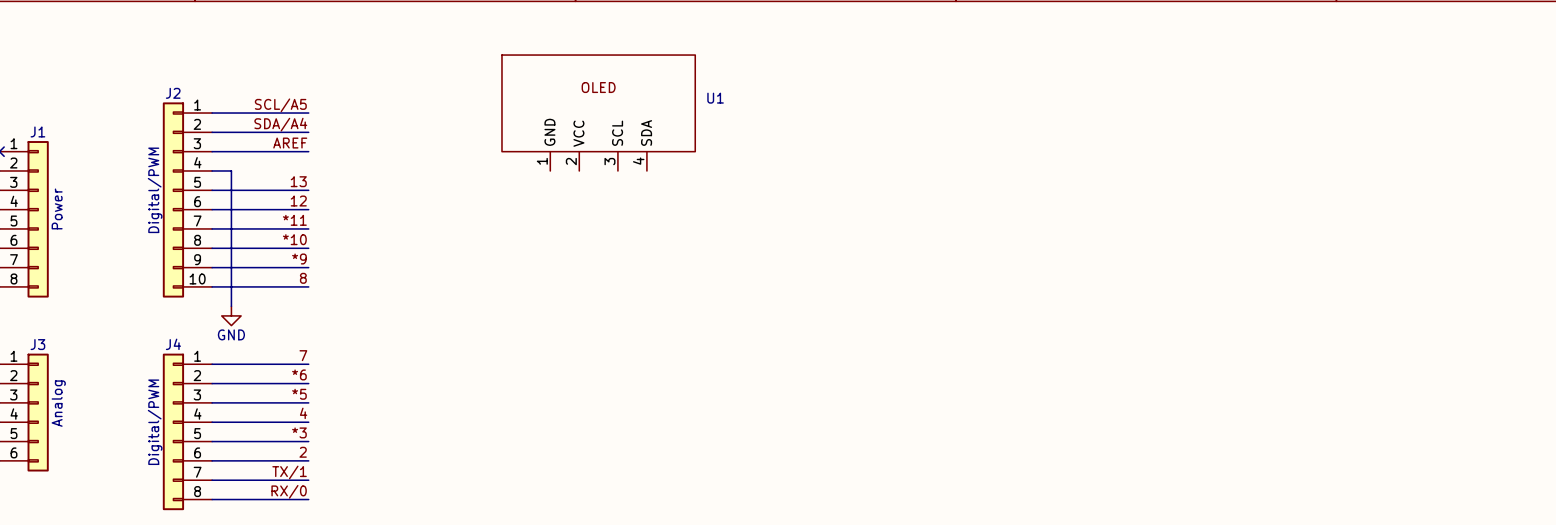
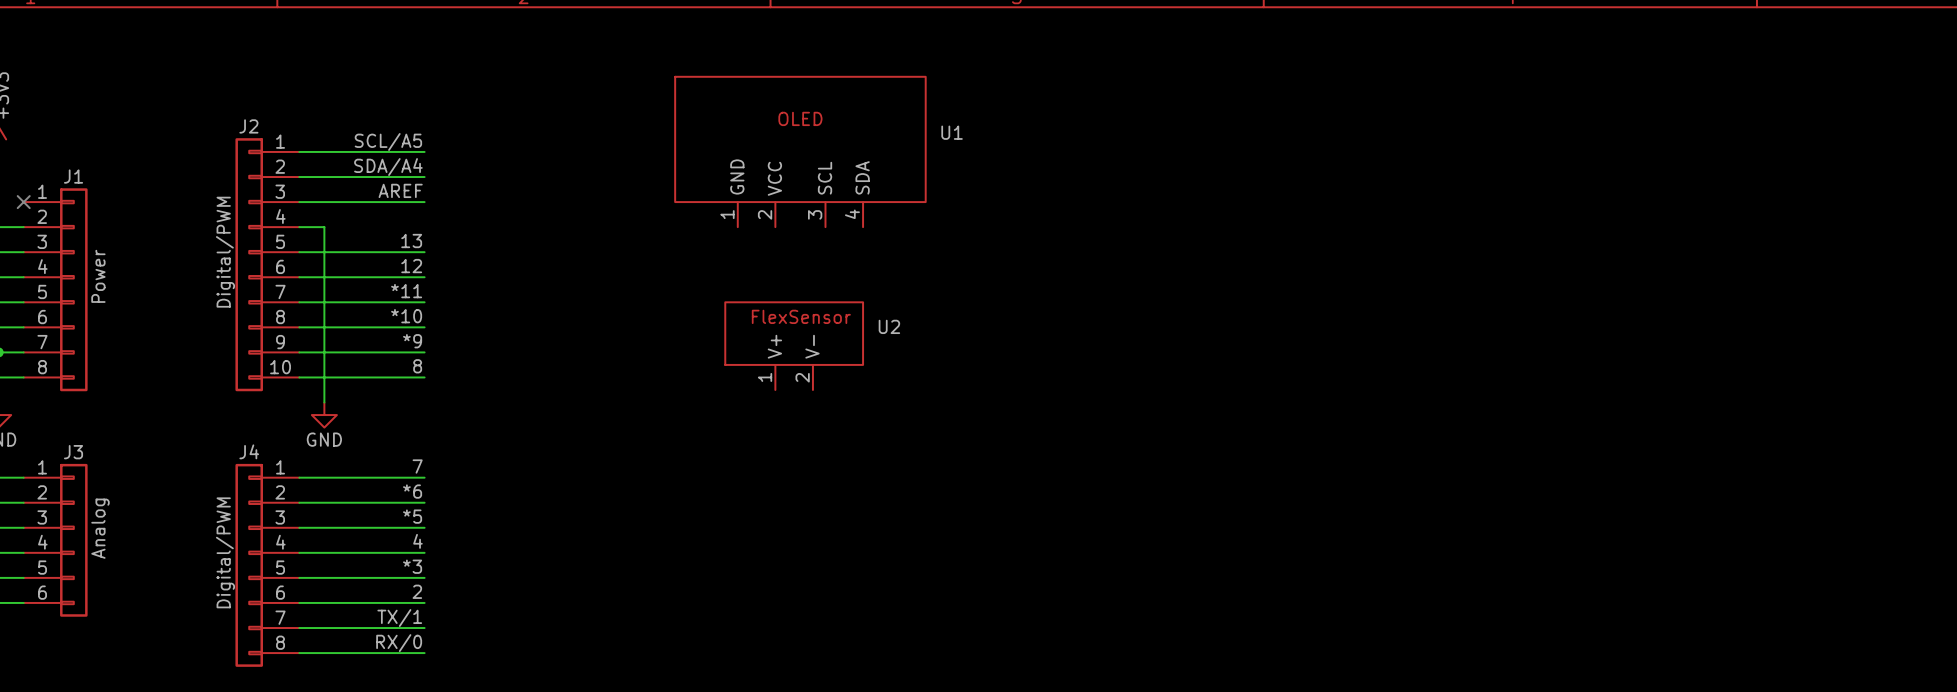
U2: none -> (794, 346)

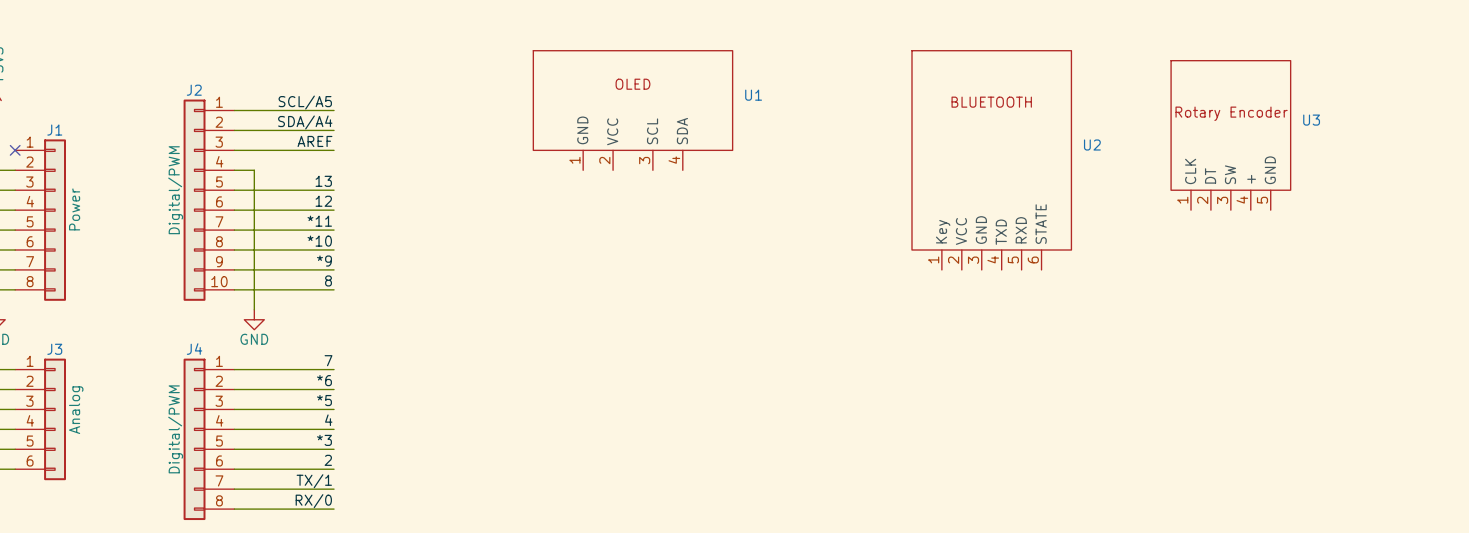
U3: none -> (1230, 135)
U2 symbol: [725, 302, 864, 390] -> [911, 50, 1072, 270]
U2 name position: U2 (889, 326) -> U2 (1092, 145)

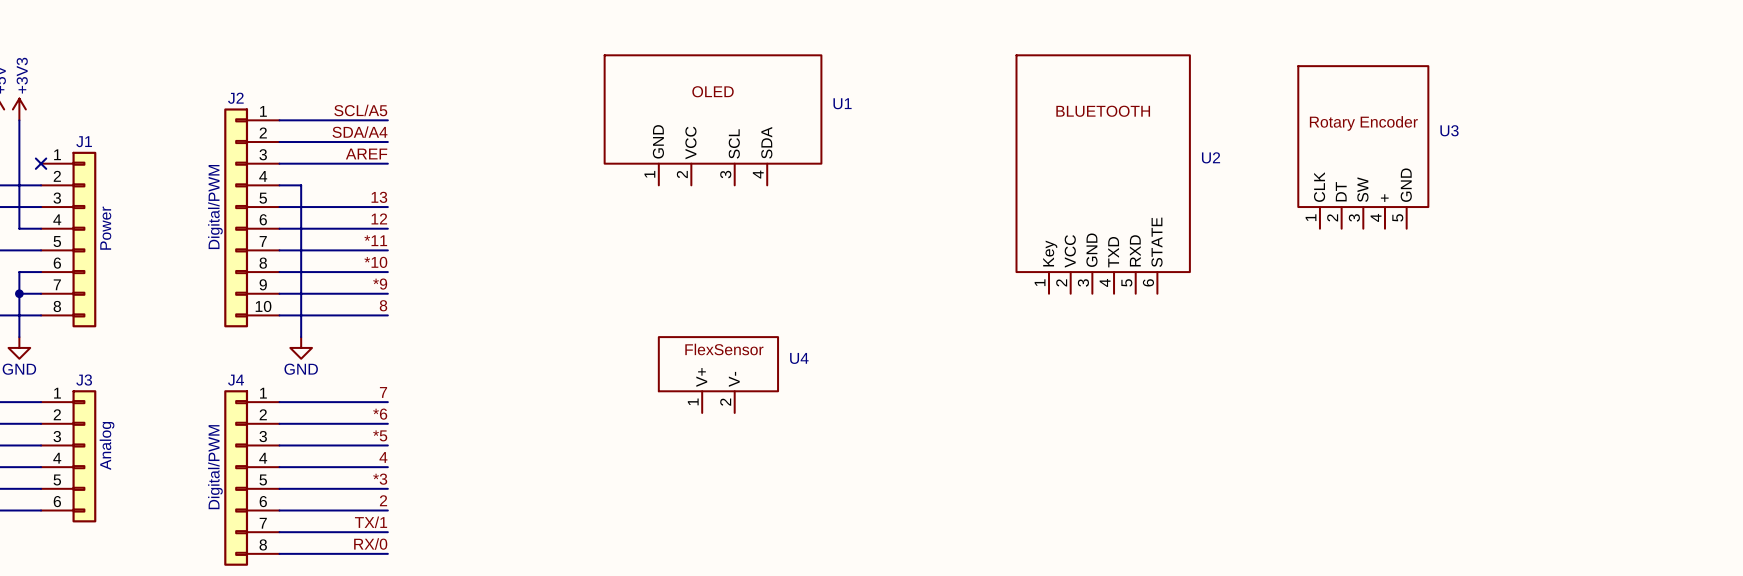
U4: none -> (718, 375)

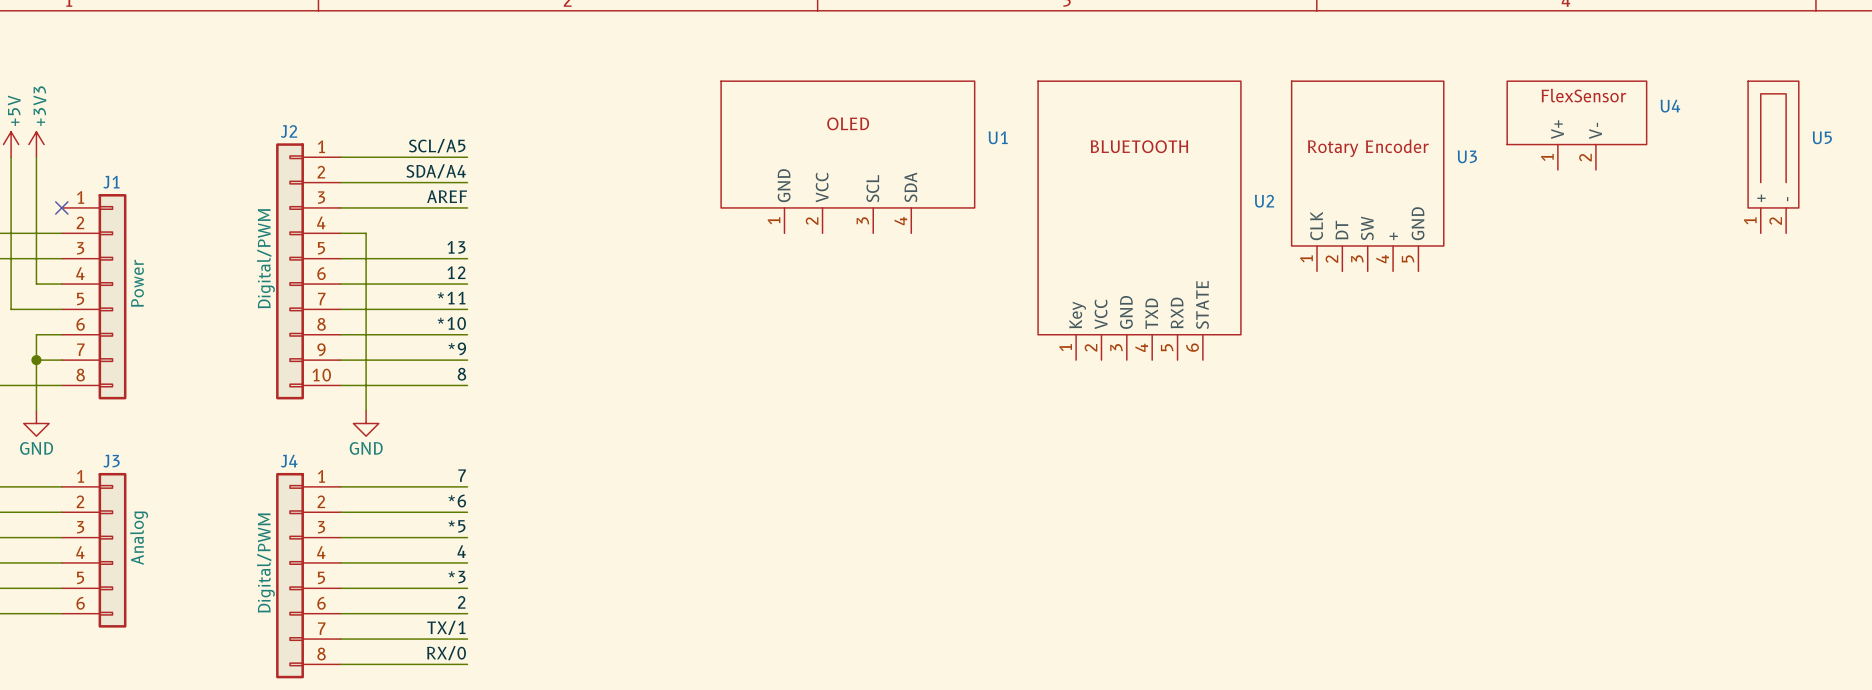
U5: none -> (1773, 157)
U3 position: (1363, 147) -> (1367, 176)
U2 position: (1103, 174) -> (1139, 220)
U4 position: (718, 375) -> (1576, 125)

